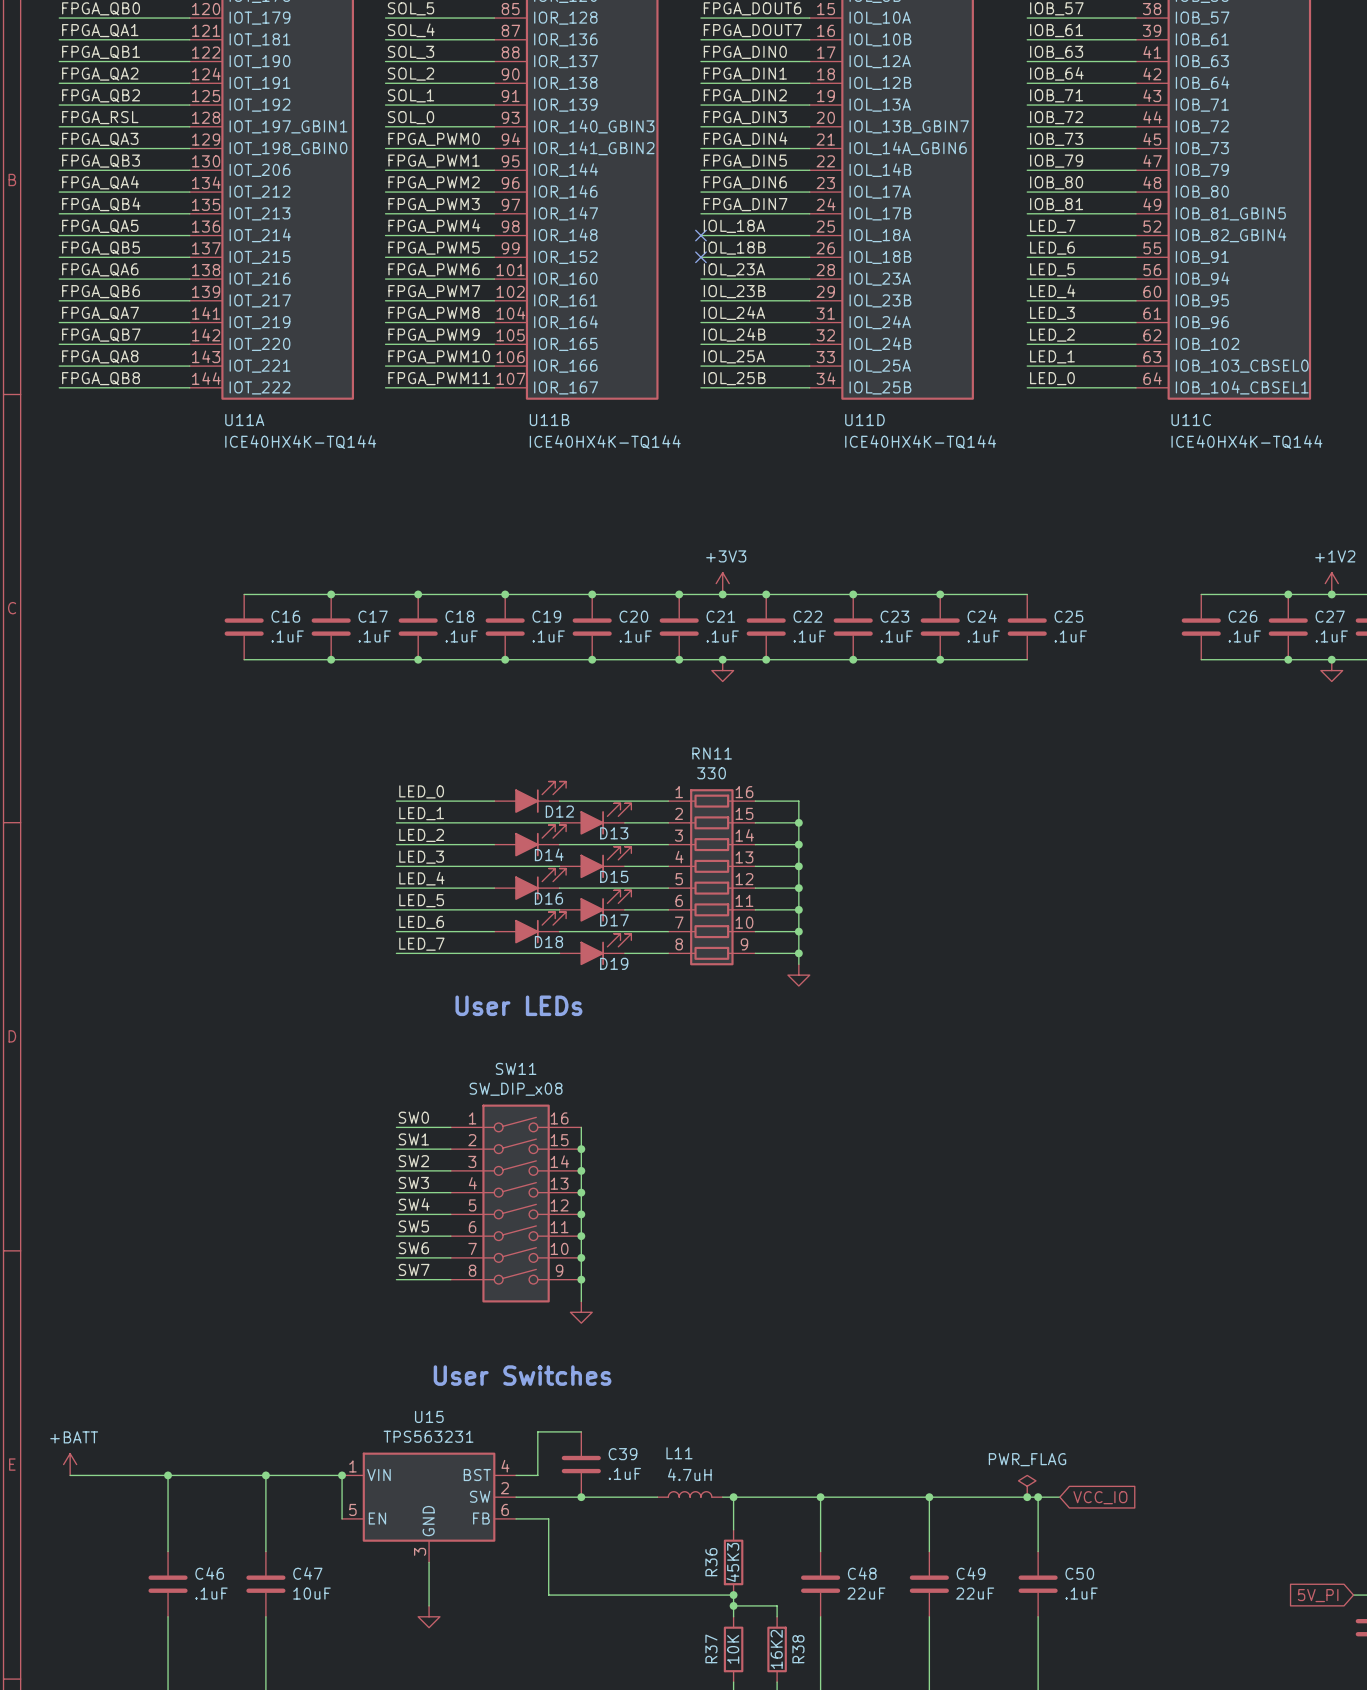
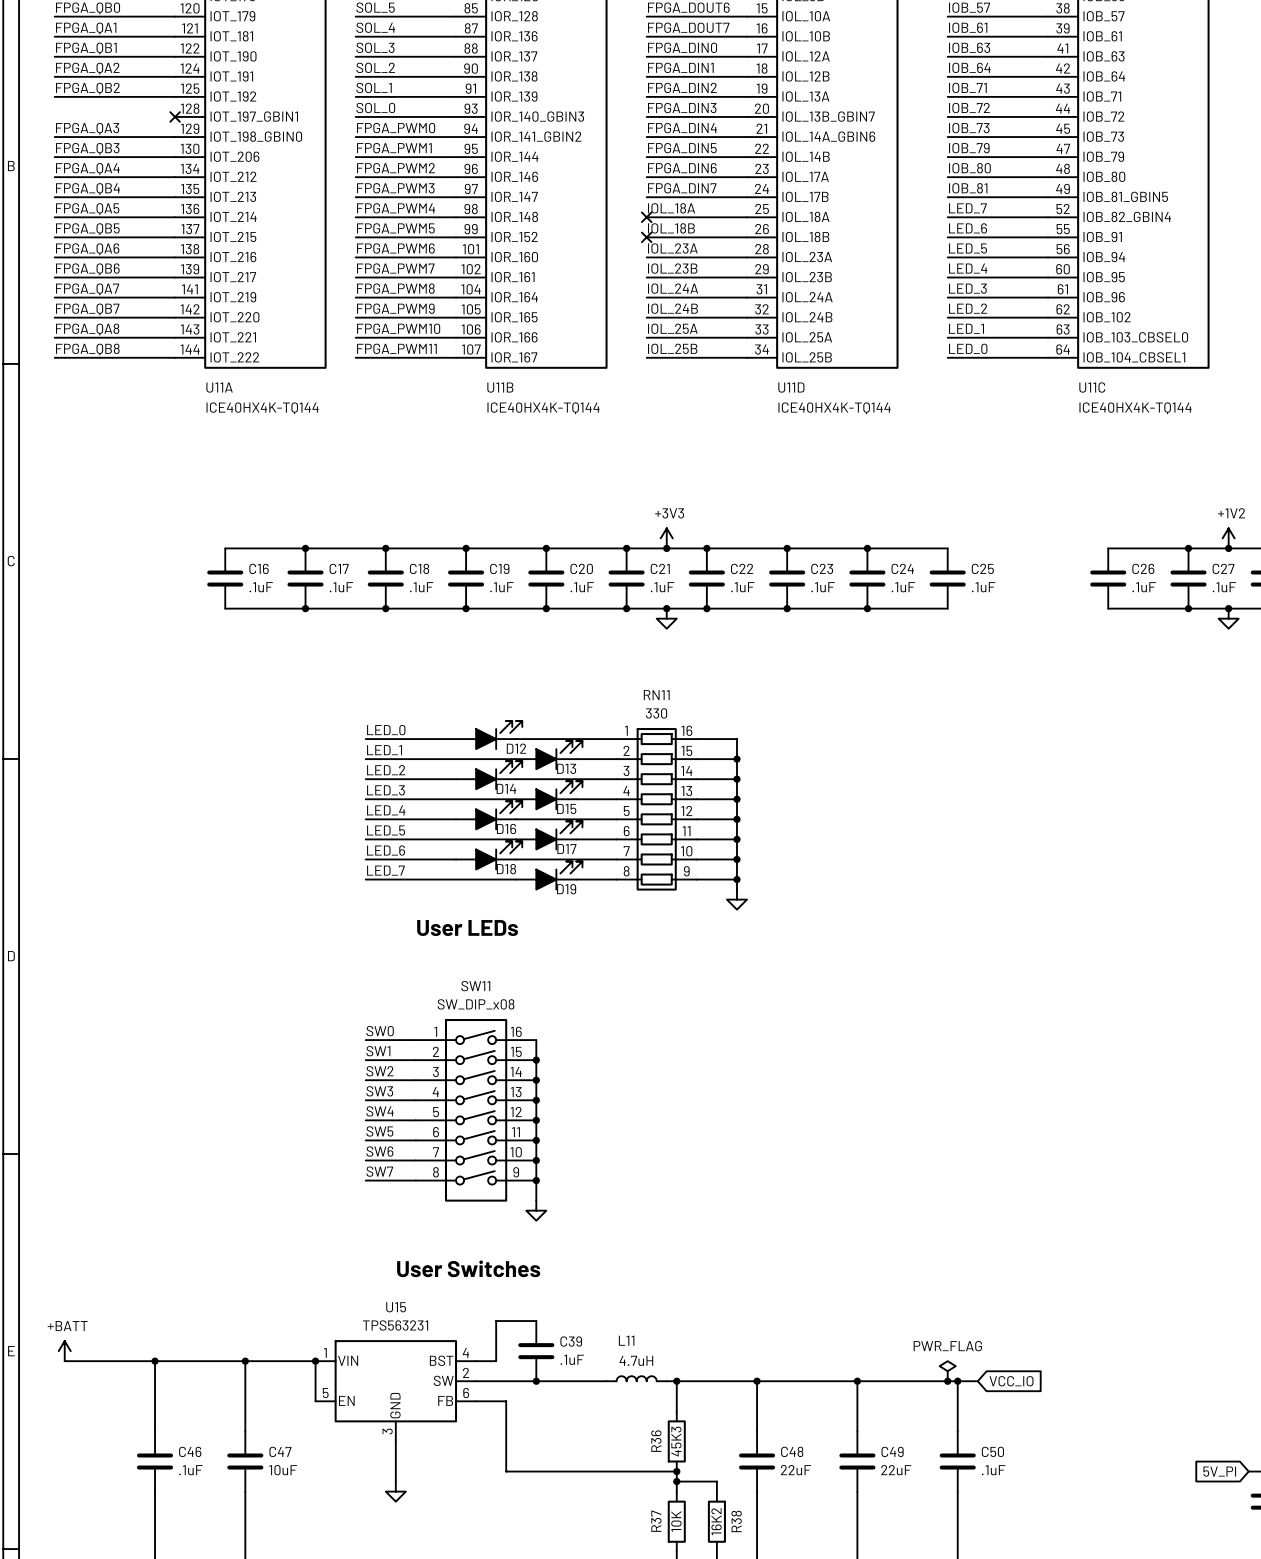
label: FPGA_RSL (100, 117) -> none
wire: (59, 126) (189, 126) -> none
no-connect mark: none -> (175, 116)

